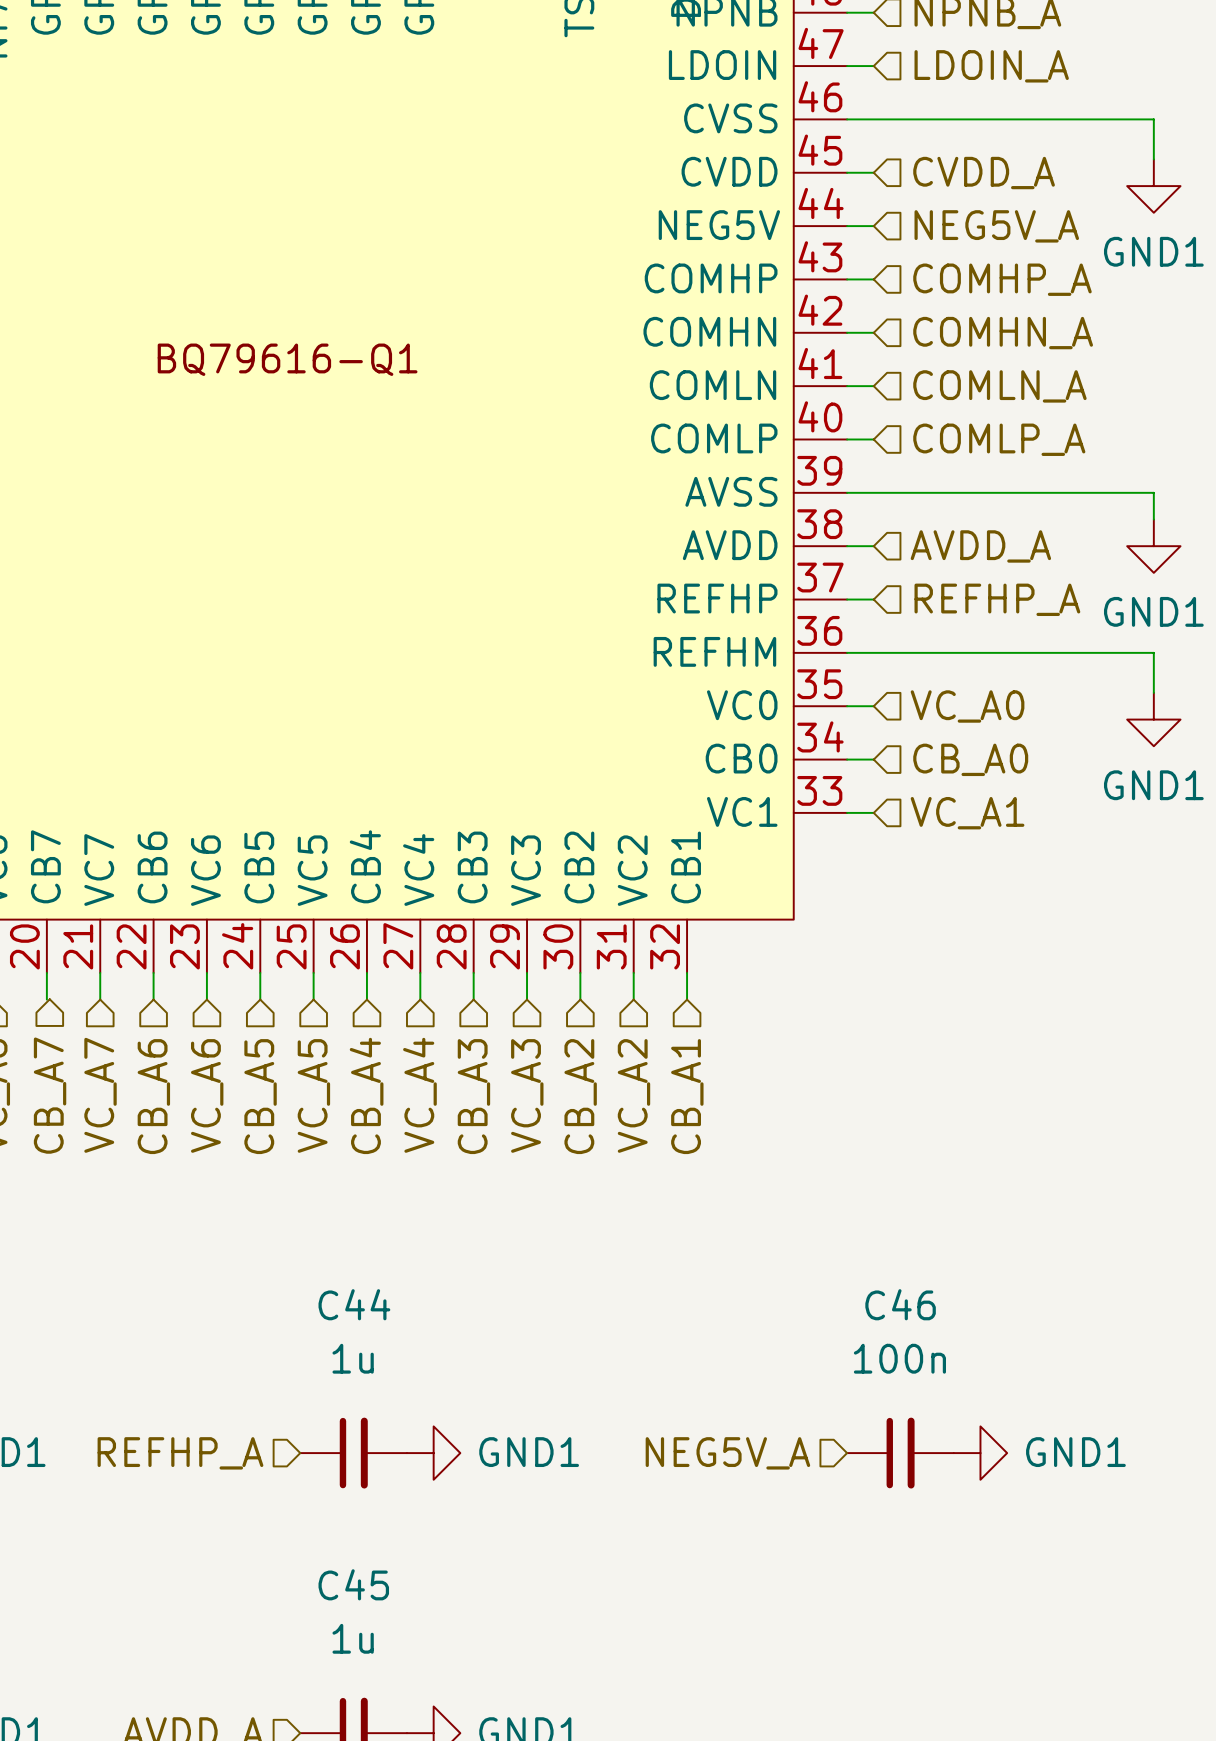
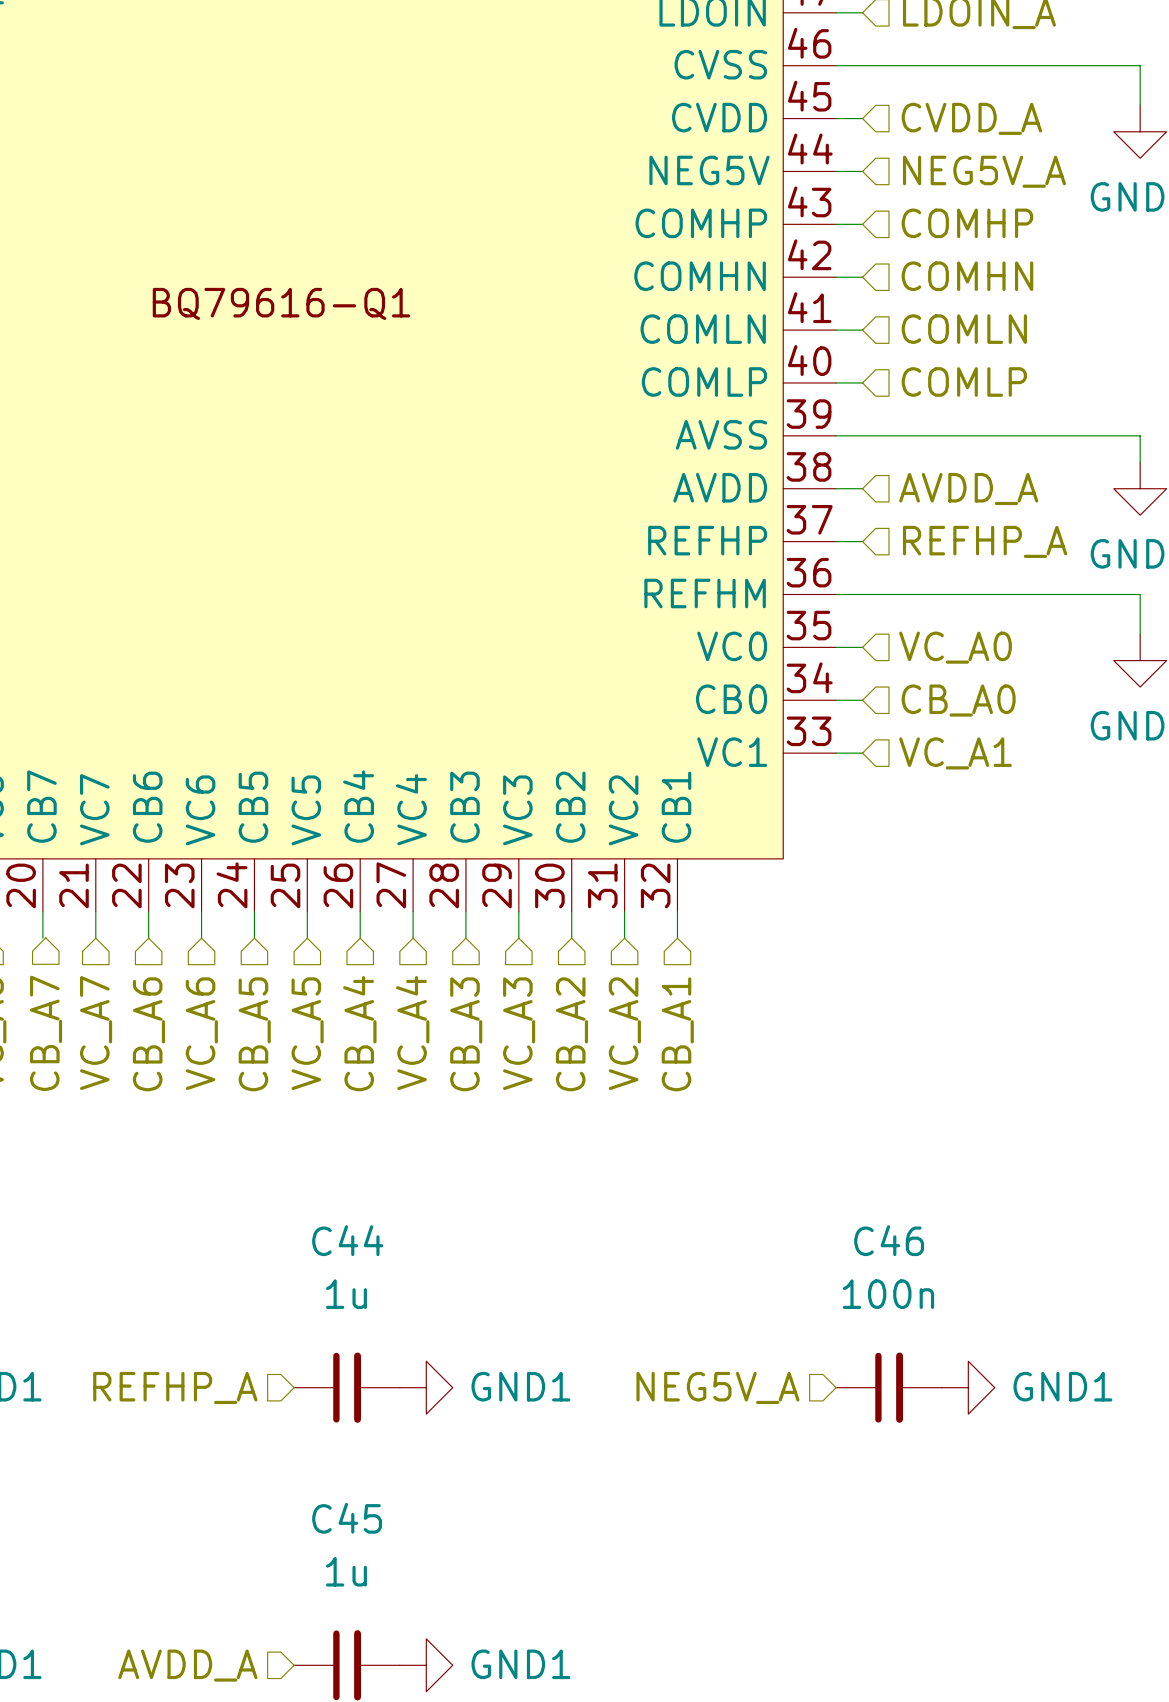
hierarchical label: COMHP_A (1002, 279) -> COMHP (967, 223)
hierarchical label: COMHN_A (1003, 333) -> COMHN (967, 276)
hierarchical label: COMLN_A (999, 386) -> COMLN (964, 329)
hierarchical label: COMLP_A (999, 439) -> COMLP (964, 381)

